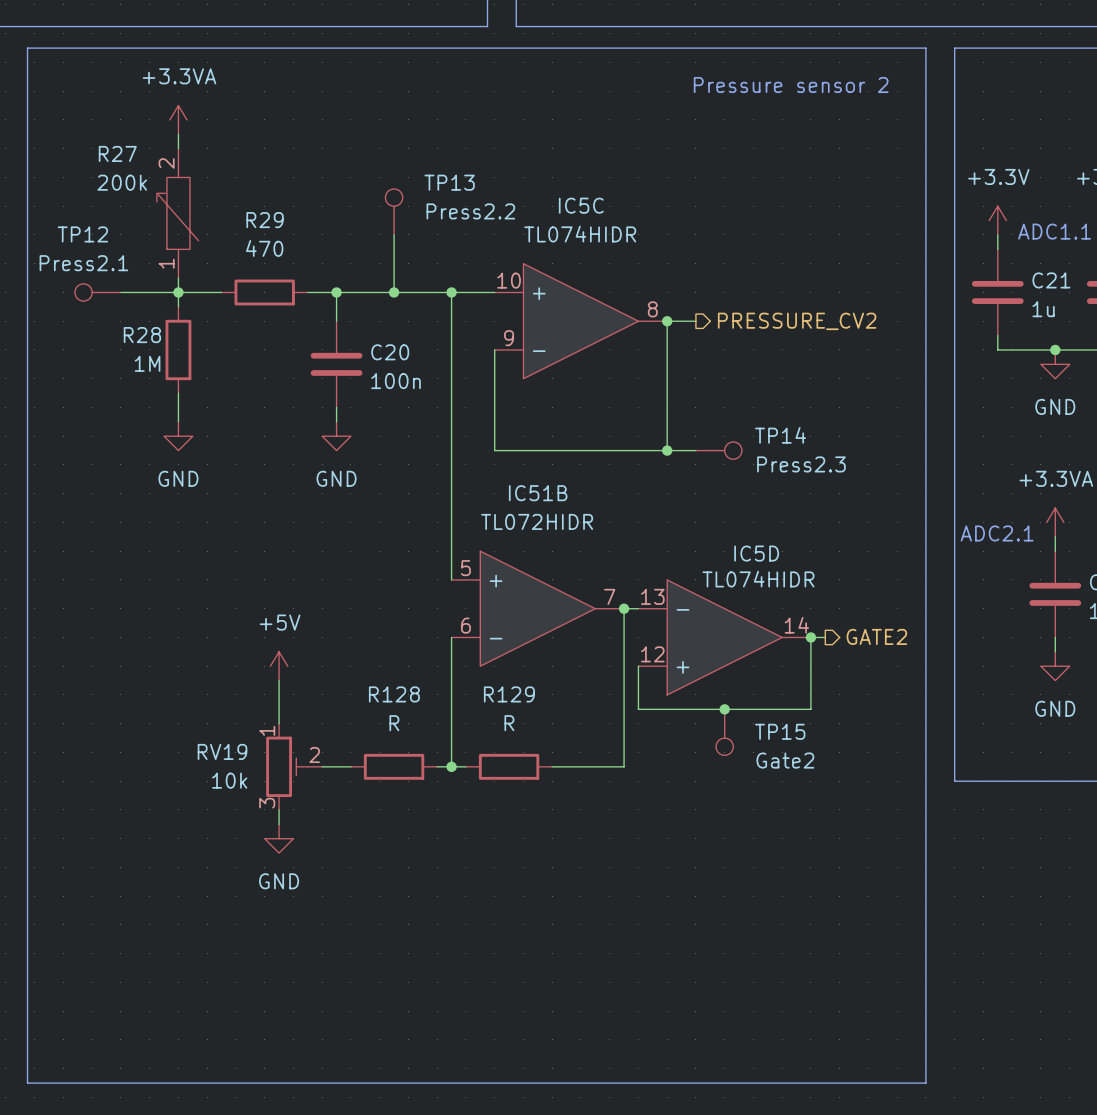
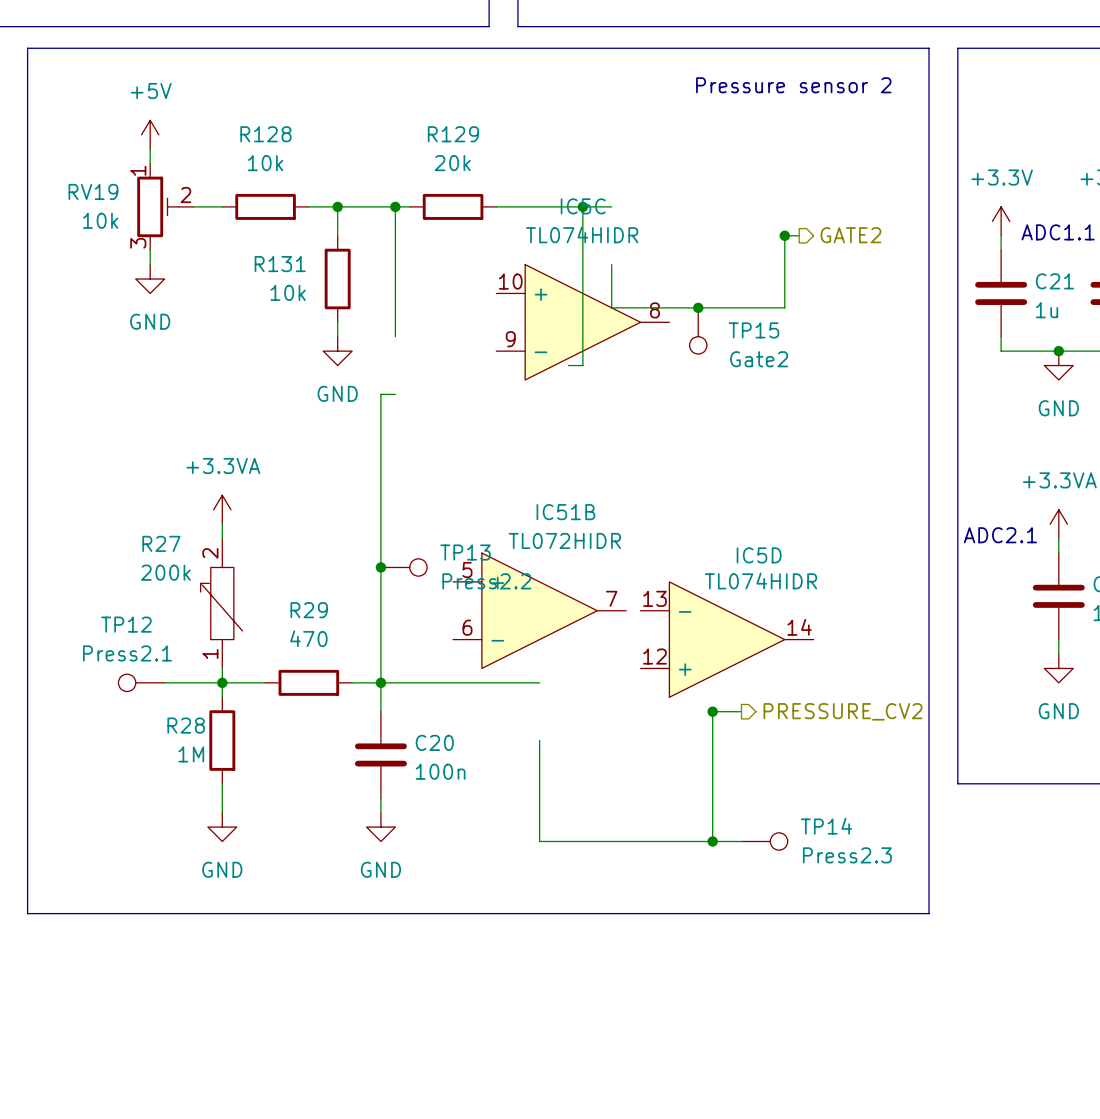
power symbol: +3.3VA (178, 119) -> none
power symbol: none -> +5V (150, 134)
wire: (178, 134) (178, 148) -> (150, 149) (150, 163)
TP13 rotation: 0° (394, 197) -> 90° clockwise (418, 567)
wire: none -> (193, 206) (222, 206)
junction: none -> (337, 206)
junction: none -> (395, 206)
wire: none -> (496, 206) (611, 206)
wire: none -> (582, 206) (582, 365) (568, 365)
junction: none -> (582, 206)
TP13 position: (394, 211) -> (404, 567)
R27 position: (177, 213) -> (221, 603)
junction: none -> (784, 235)
wire: none -> (799, 235) (784, 235) (784, 307) (611, 307) (611, 264)
hierarchical label: none -> GATE2 (850, 235)
wire: none -> (150, 250) (150, 264)
power symbol: none -> GND (150, 279)
wire: (178, 278) (178, 306) -> (337, 206) (337, 235)
R131: none -> 10k (337, 279)
TP12 position: (97, 292) -> (141, 682)
wire: (120, 292) (221, 292) -> (308, 206) (409, 206)
junction: (178, 292) -> none
R29 position: (264, 292) -> (308, 682)
wire: (307, 292) (494, 292) -> none
junction: (336, 292) -> none
wire: none -> (395, 293) (395, 336)
junction: (394, 292) -> none
wire: (451, 292) (451, 579) -> none
junction: (451, 292) -> none
junction position: (667, 321) -> (698, 307)
wire: (695, 321) (667, 321) (667, 450) -> none
hierarchical label: PRESSURE_CV2 (797, 321) -> none
R28 position: (178, 349) -> (222, 740)
wire: (494, 349) (494, 450) (695, 450) -> none
C20 position: (336, 364) -> (380, 754)
wire: (178, 393) (178, 421) -> (222, 668) (222, 697)
wire: none -> (395, 394) (380, 394) (380, 711)
wire: (336, 407) (336, 421) -> (222, 524) (222, 538)
power symbol: GND (178, 436) -> none
power symbol position: GND (336, 436) -> GND (337, 351)
junction: (667, 450) -> none
TP14 position: (718, 450) -> (764, 841)
IC51B name position: IC51B (538, 493) -> IC51B (565, 512)
power symbol: none -> +3.3VA (222, 509)
IC51B value position: TL072HIDR (537, 521) -> TL072HIDR (564, 540)
junction: none -> (380, 567)
junction: (624, 608) -> none
wire: (638, 608) (624, 608) (624, 766) (552, 766) -> none
hierarchical label: GATE2 (876, 636) -> none
wire: (451, 637) (451, 766) -> none
junction: (810, 637) -> none
wire: (825, 637) (810, 637) (810, 709) (739, 709) -> none
power symbol: +5V (279, 666) -> none
wire: (638, 666) (638, 709) (710, 709) -> (712, 841) (712, 711)
wire: none -> (164, 682) (265, 682)
junction: none -> (222, 682)
wire: (279, 680) (279, 723) -> none
wire: none -> (352, 682) (539, 682)
junction: none -> (380, 682)
junction position: (724, 709) -> (712, 711)
hierarchical label: none -> PRESSURE_CV2 (843, 711)
R128 value: R (394, 723) -> 10k (265, 163)
R129 value: R (509, 723) -> 20k (452, 163)
TP15 position: (724, 732) -> (698, 330)
wire: none -> (539, 740) (539, 841) (741, 841)
RV19 position: (294, 766) -> (165, 206)
wire: (322, 766) (350, 766) -> none
R128 position: (394, 766) -> (265, 206)
wire: (437, 766) (465, 766) -> none
junction: (451, 766) -> none
R129 position: (509, 766) -> (453, 206)
wire: none -> (222, 783) (222, 812)
wire: (279, 809) (279, 824) -> (380, 798) (380, 812)
power symbol: none -> GND (222, 827)
power symbol: none -> GND (380, 827)
power symbol: GND (279, 838) -> none
junction: none -> (712, 841)
line: (27, 910) (27, 1083) (925, 1083) (925, 910) -> (27, 913) (929, 913)

